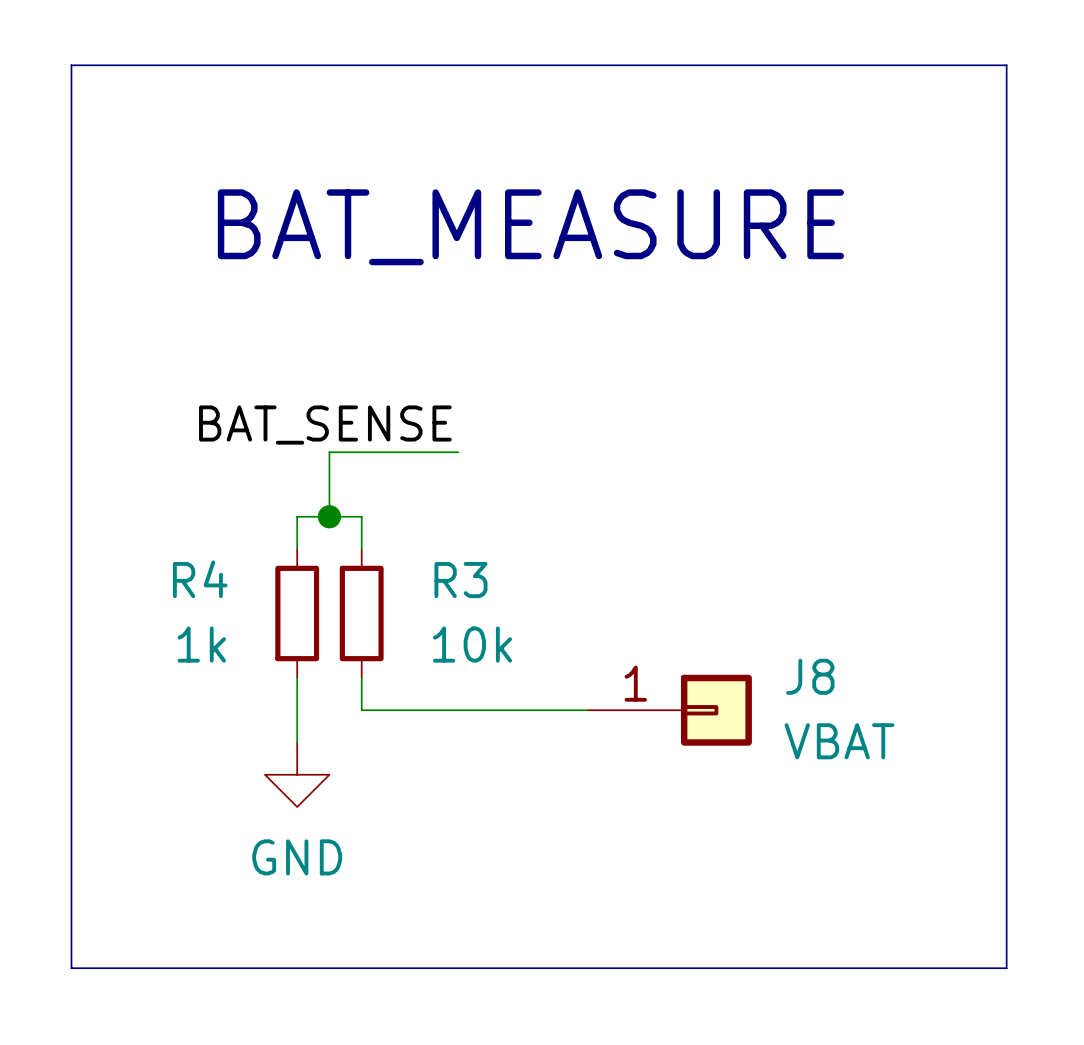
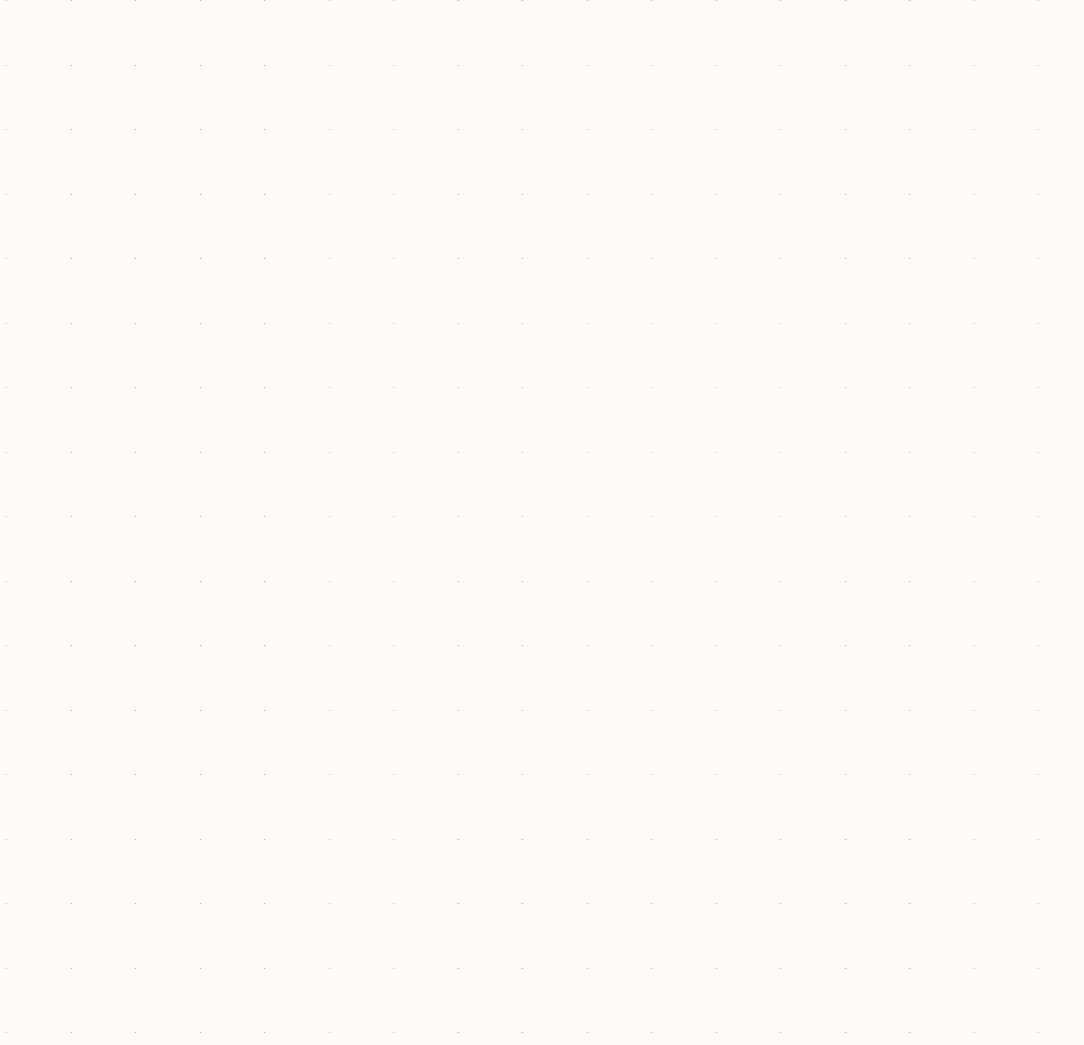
line: (71, 65) (1006, 65) (1006, 968) (71, 968) (71, 65) -> none
text: BAT_MEASURE (530, 227) -> none
label: BAT_SENSE (325, 425) -> none
wire: (458, 452) (329, 452) (329, 516) -> none
junction: (329, 516) -> none
wire: (297, 549) (297, 516) (361, 516) (361, 549) -> none
R4: 1k (297, 613) -> none
R3: 10k (361, 613) -> none
wire: (297, 678) (297, 742) -> none
wire: (361, 678) (361, 710) (587, 710) -> none
J8: VBAT (669, 710) -> none
power symbol: GND (297, 774) -> none

